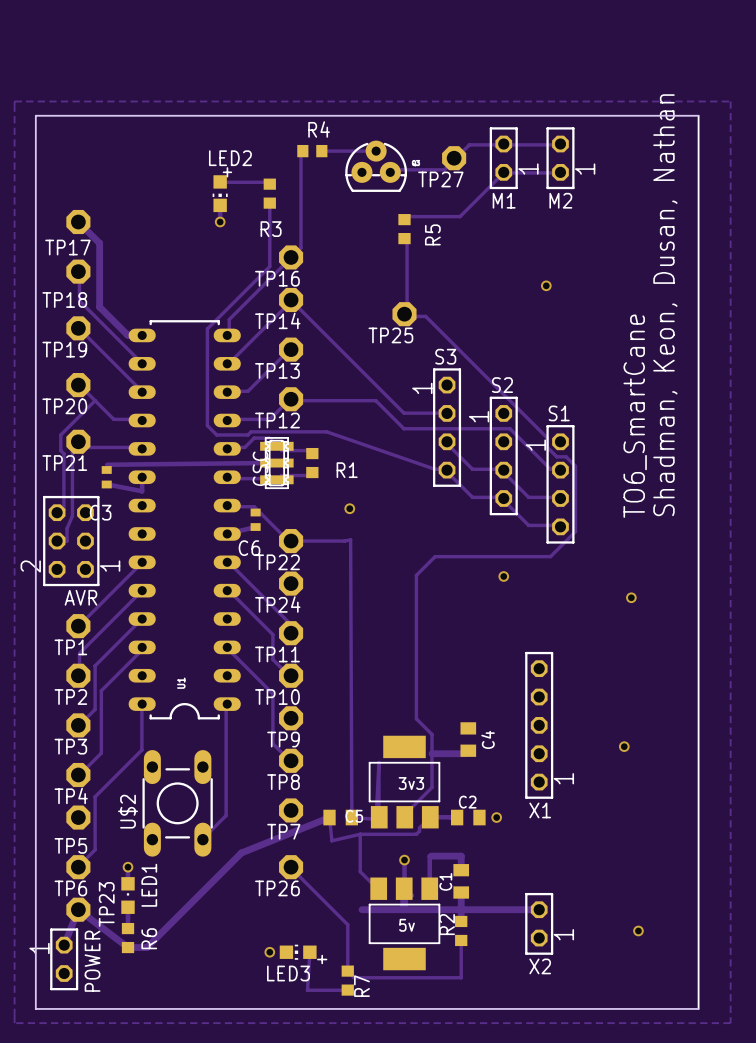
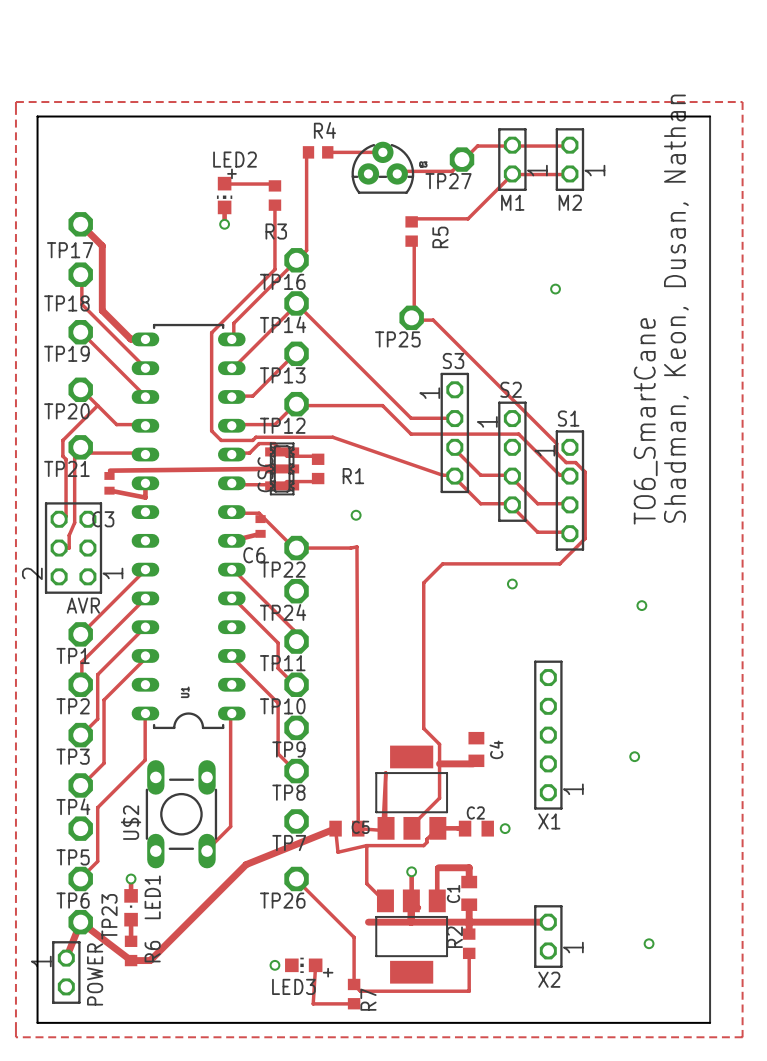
text: 3v3 (411, 783) -> none
text: 5v (407, 925) -> none

